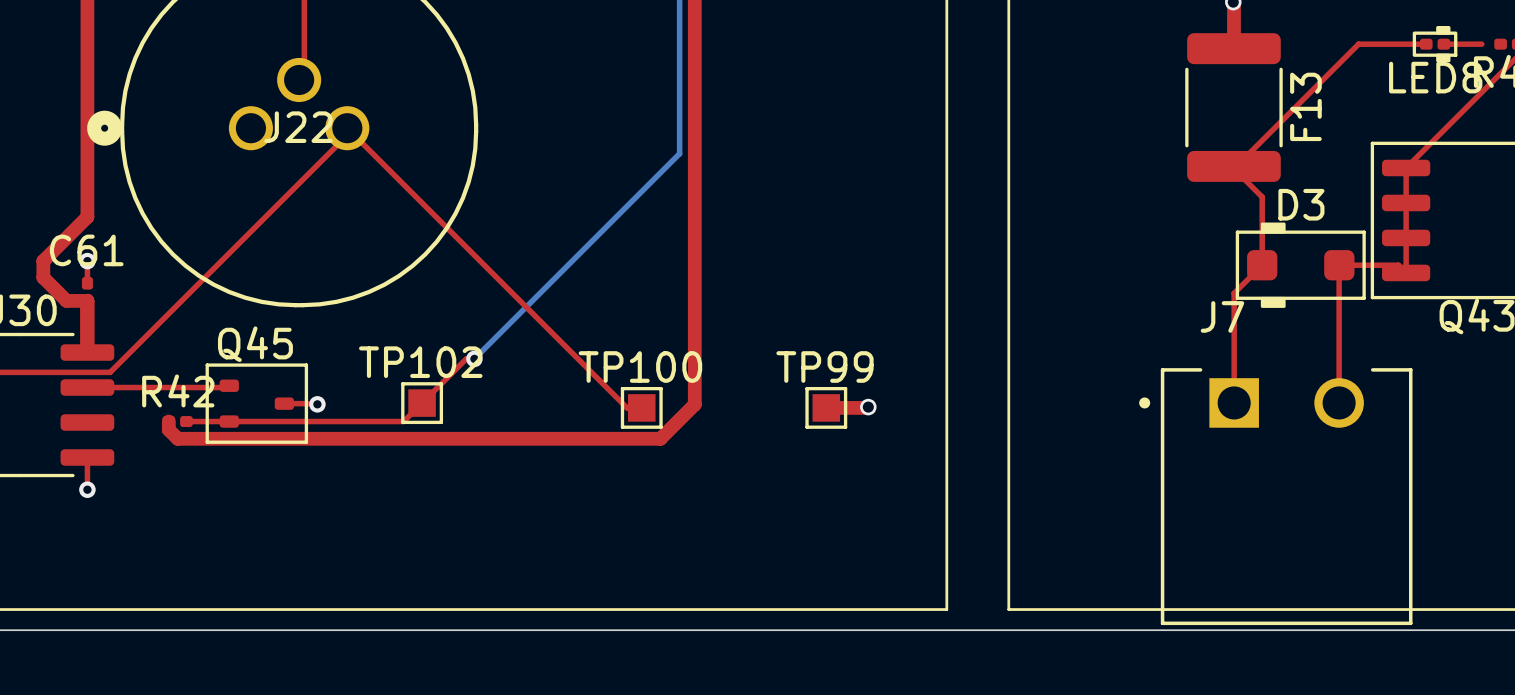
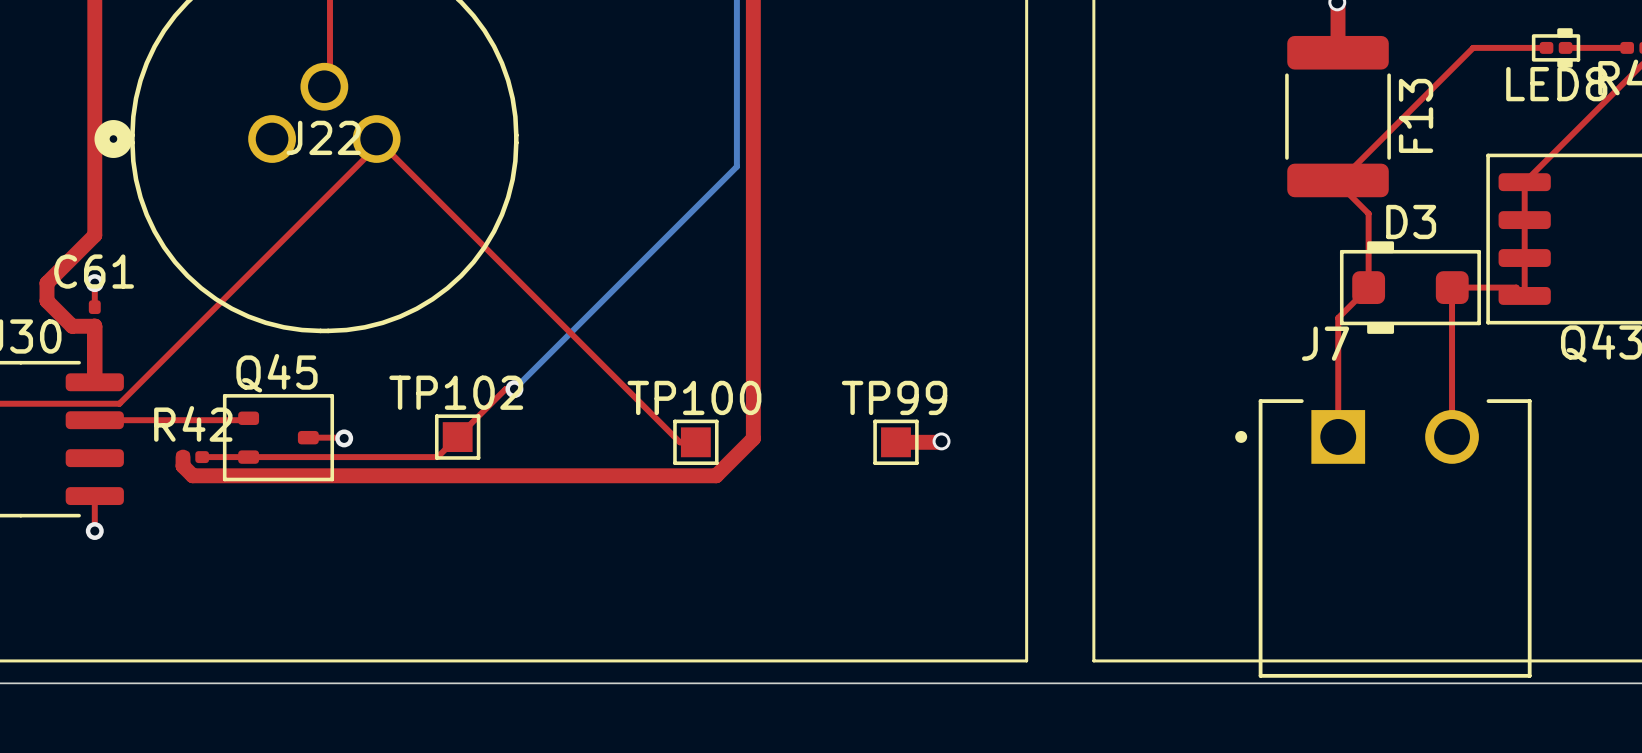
top track: none -> (1606, 47) (1627, 47)

